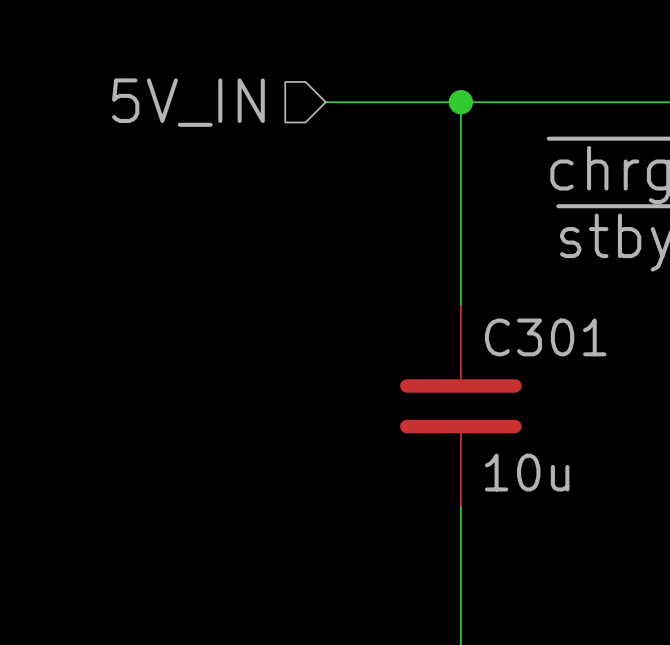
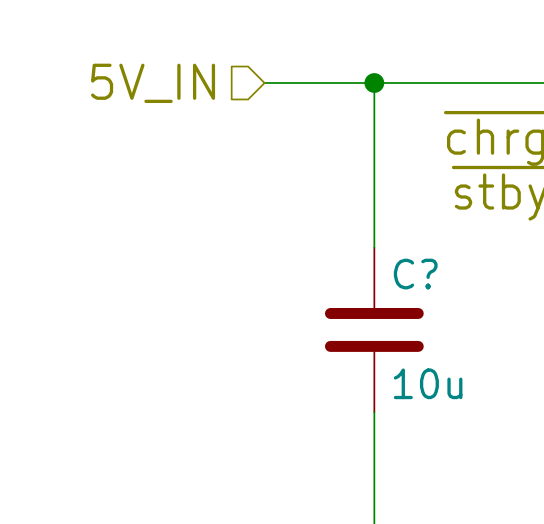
C301 name: C301 (545, 337) -> C? (415, 274)

